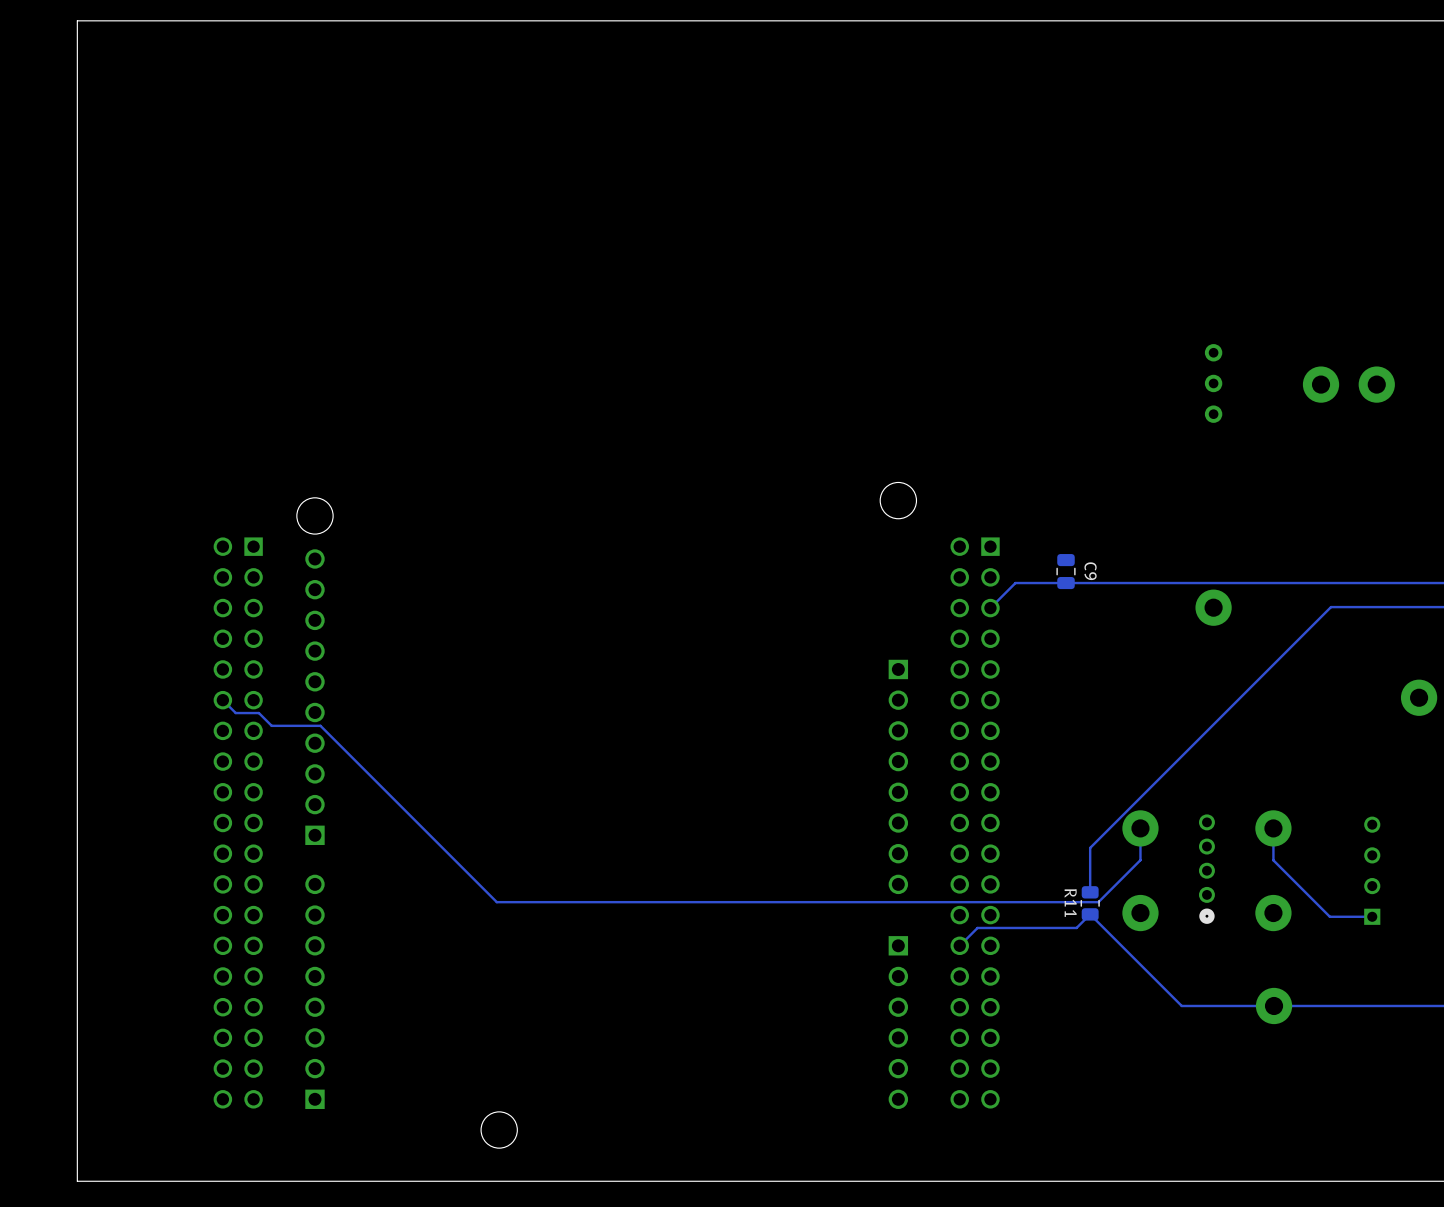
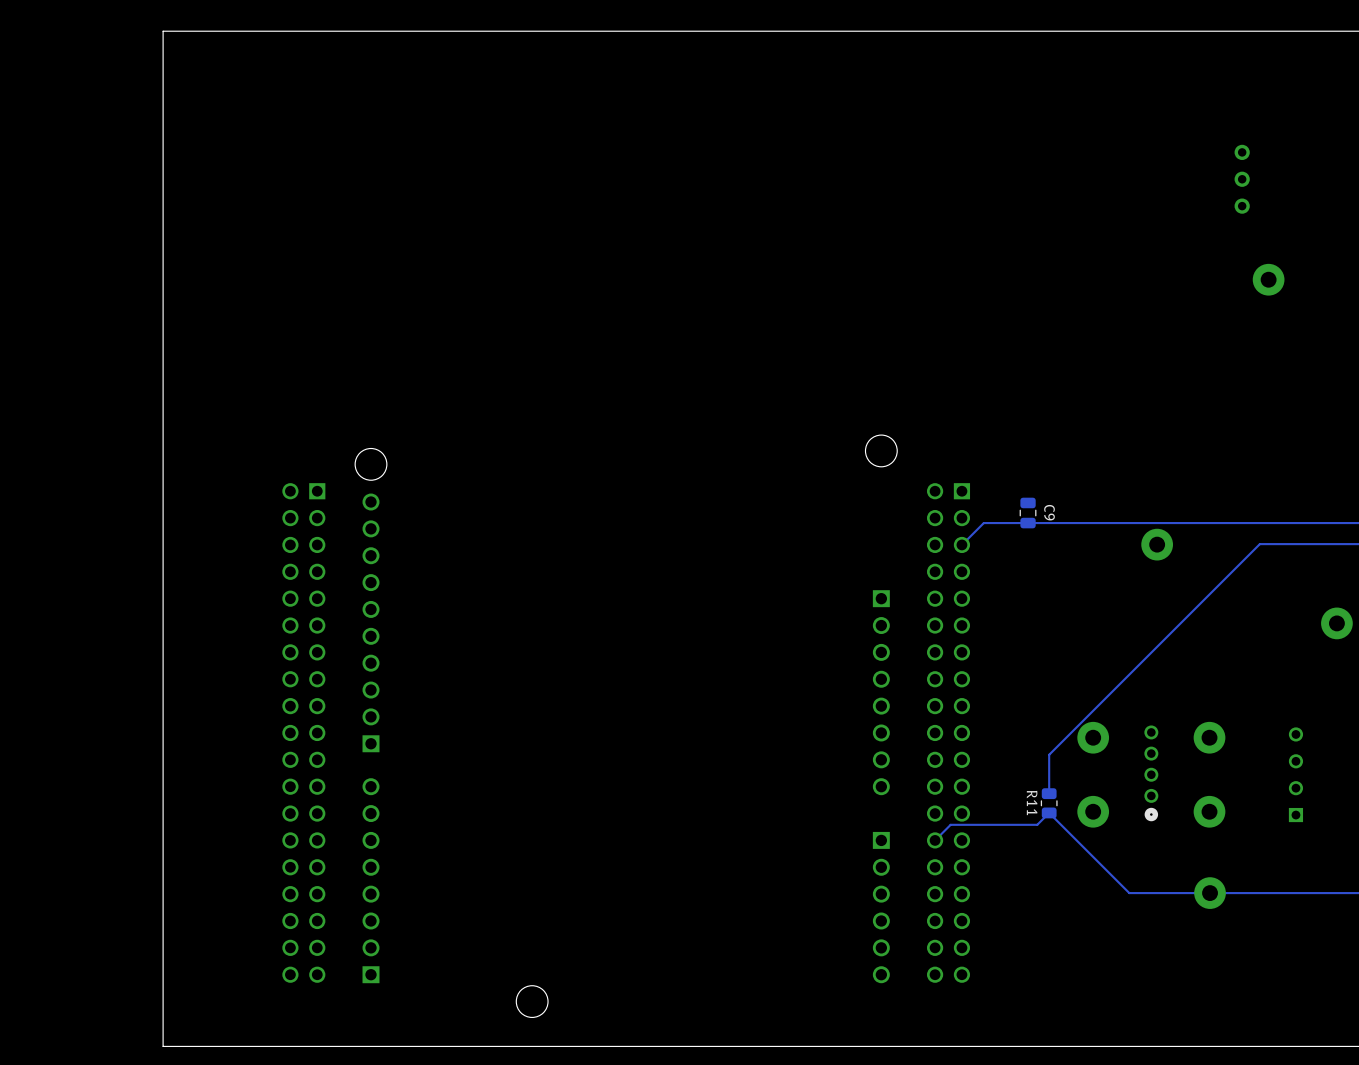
part: none -> (1268, 279)
part position: (1213, 383) -> (1242, 179)
part: (1321, 384) -> none
part: (1376, 384) -> none
track: (222, 700) (235, 713) (258, 713) (271, 725) (320, 725) (496, 902) (1098, 902) (1140, 860) (1140, 828) -> none
track: (1273, 828) (1273, 860) (1329, 916) (1372, 916) -> none

